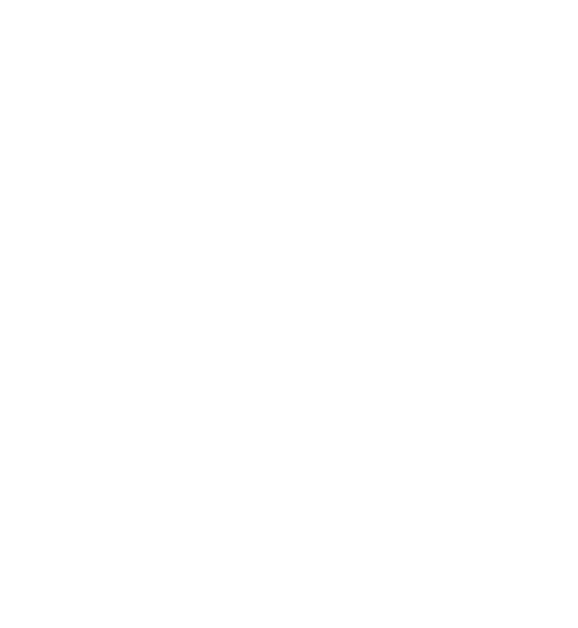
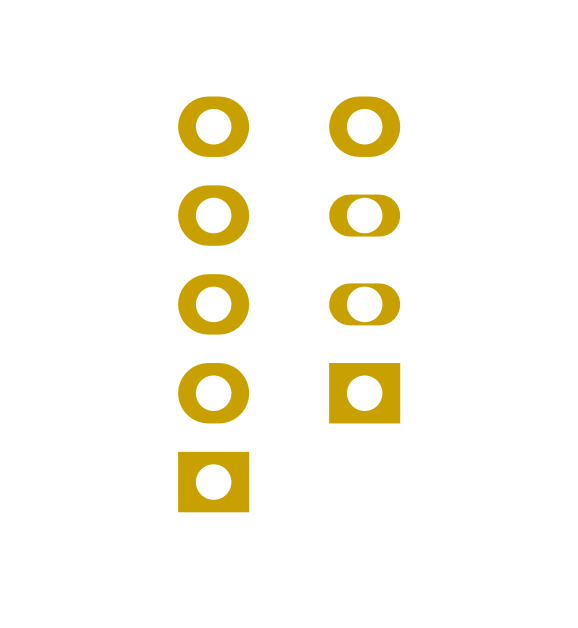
part: none -> (364, 259)
part: none -> (213, 304)

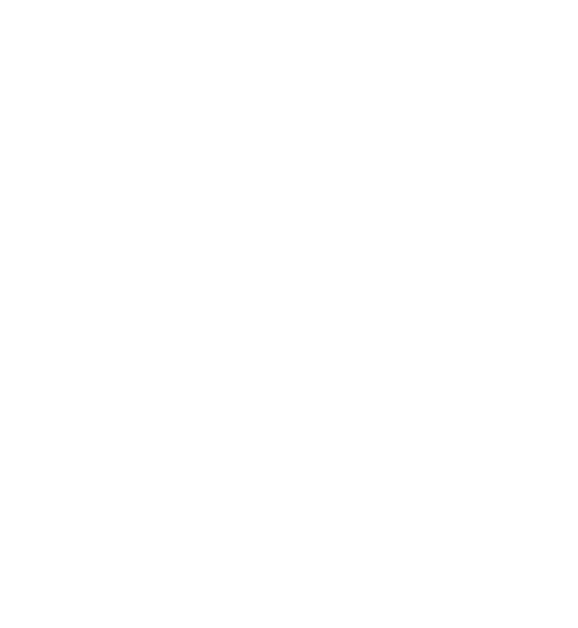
part: (364, 259) -> none
part: (213, 304) -> none

